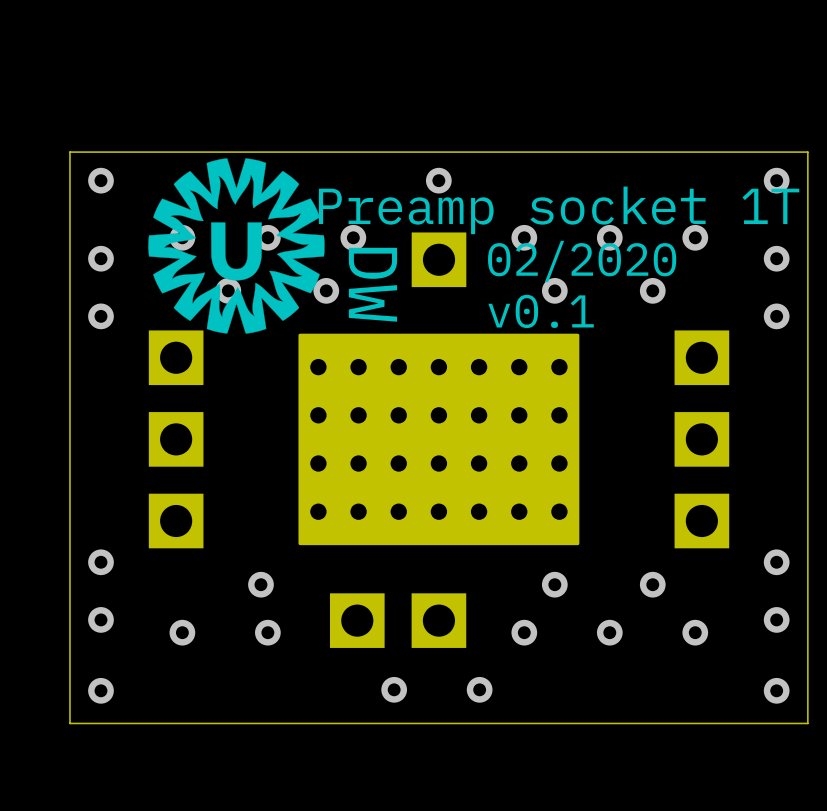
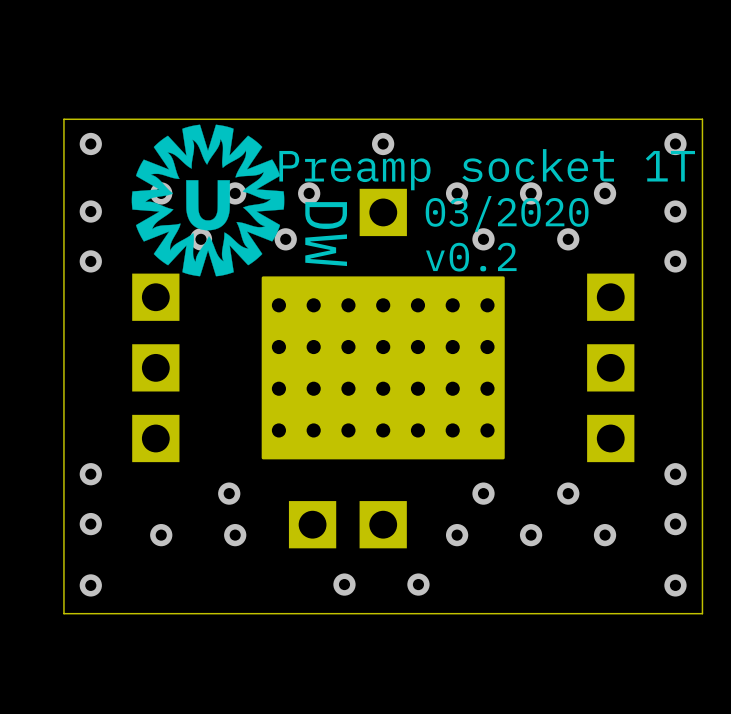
text: 02/2020 (582, 261) -> 03/2020 (507, 213)
text: v0.1 (541, 311) -> v0.2 (471, 257)

